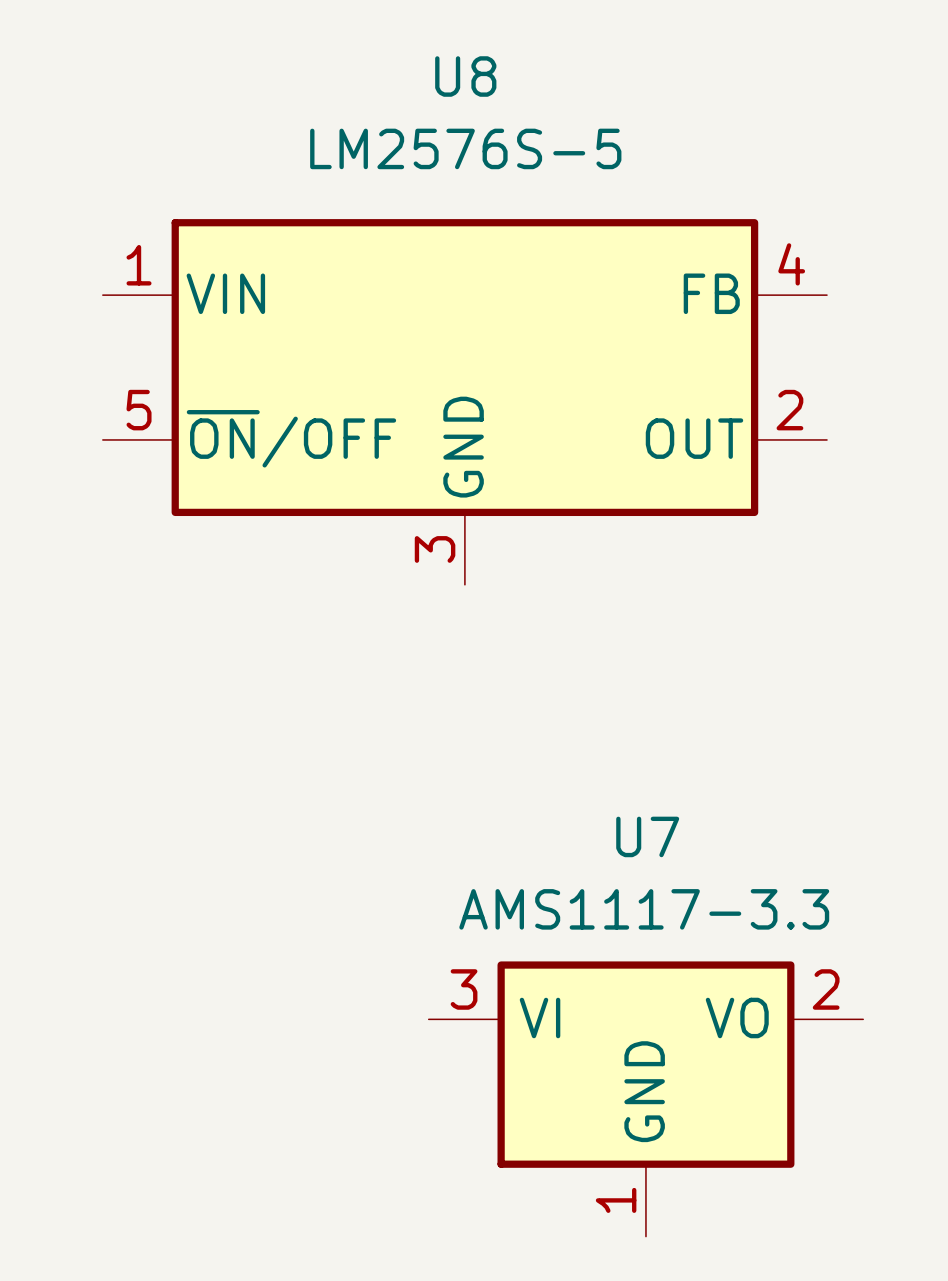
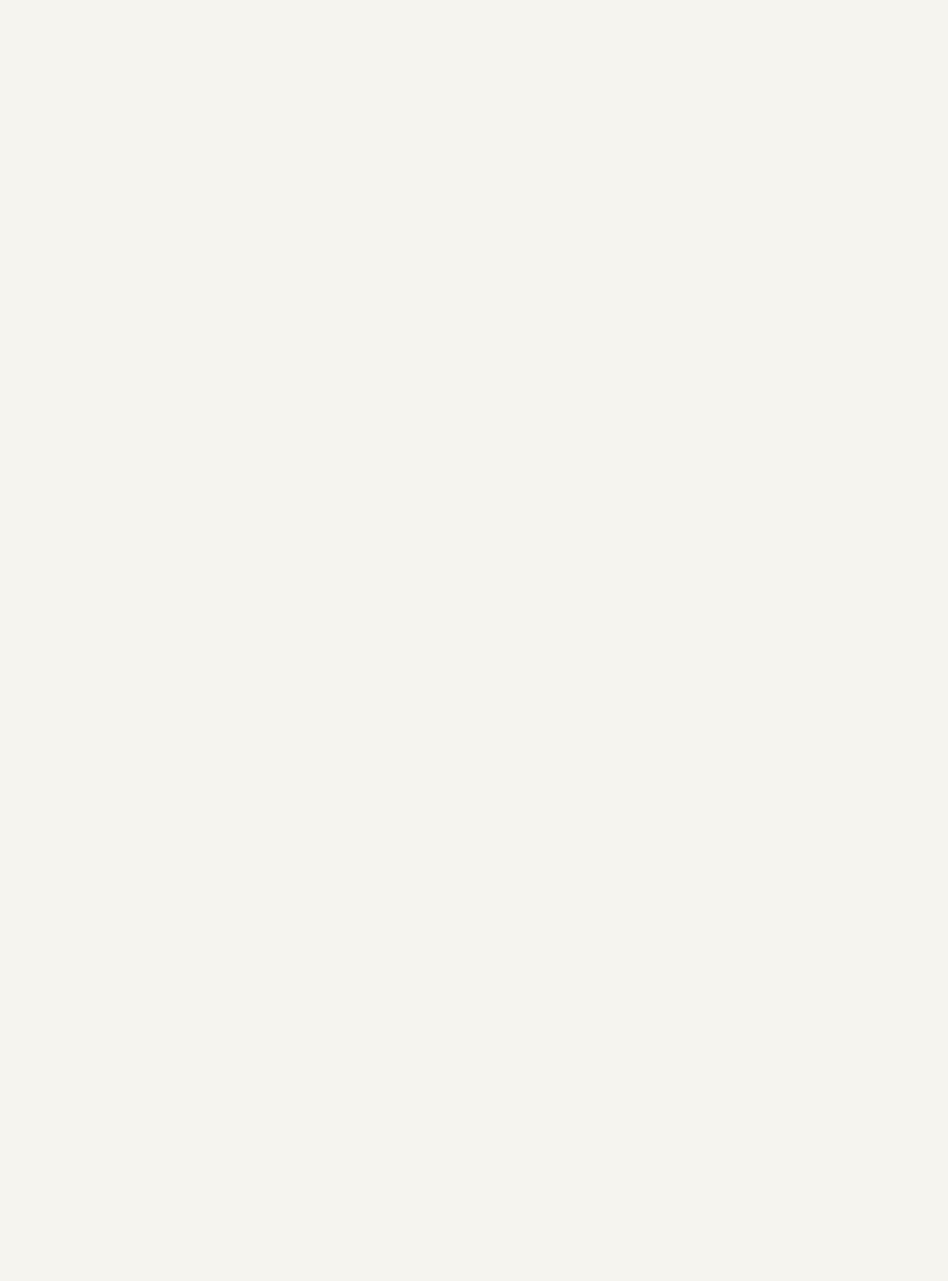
U8: LM2576S-5 (464, 401) -> none
U7: AMS1117-3.3 (645, 1099) -> none

